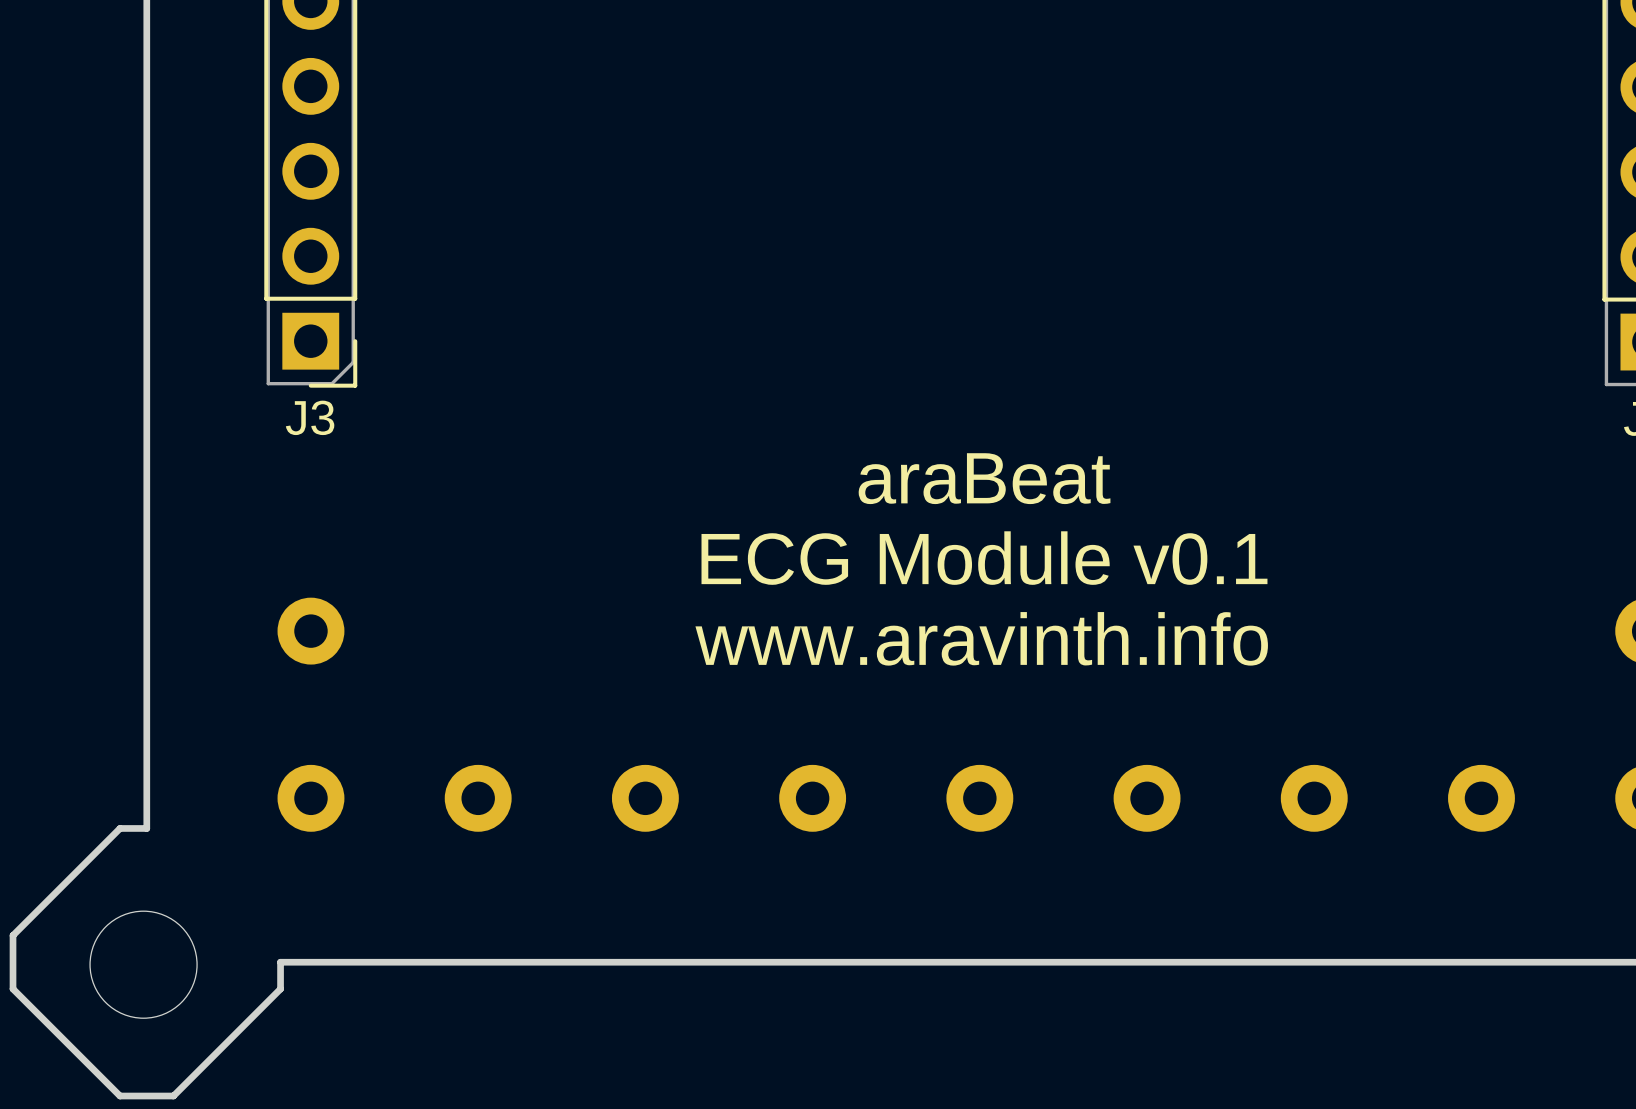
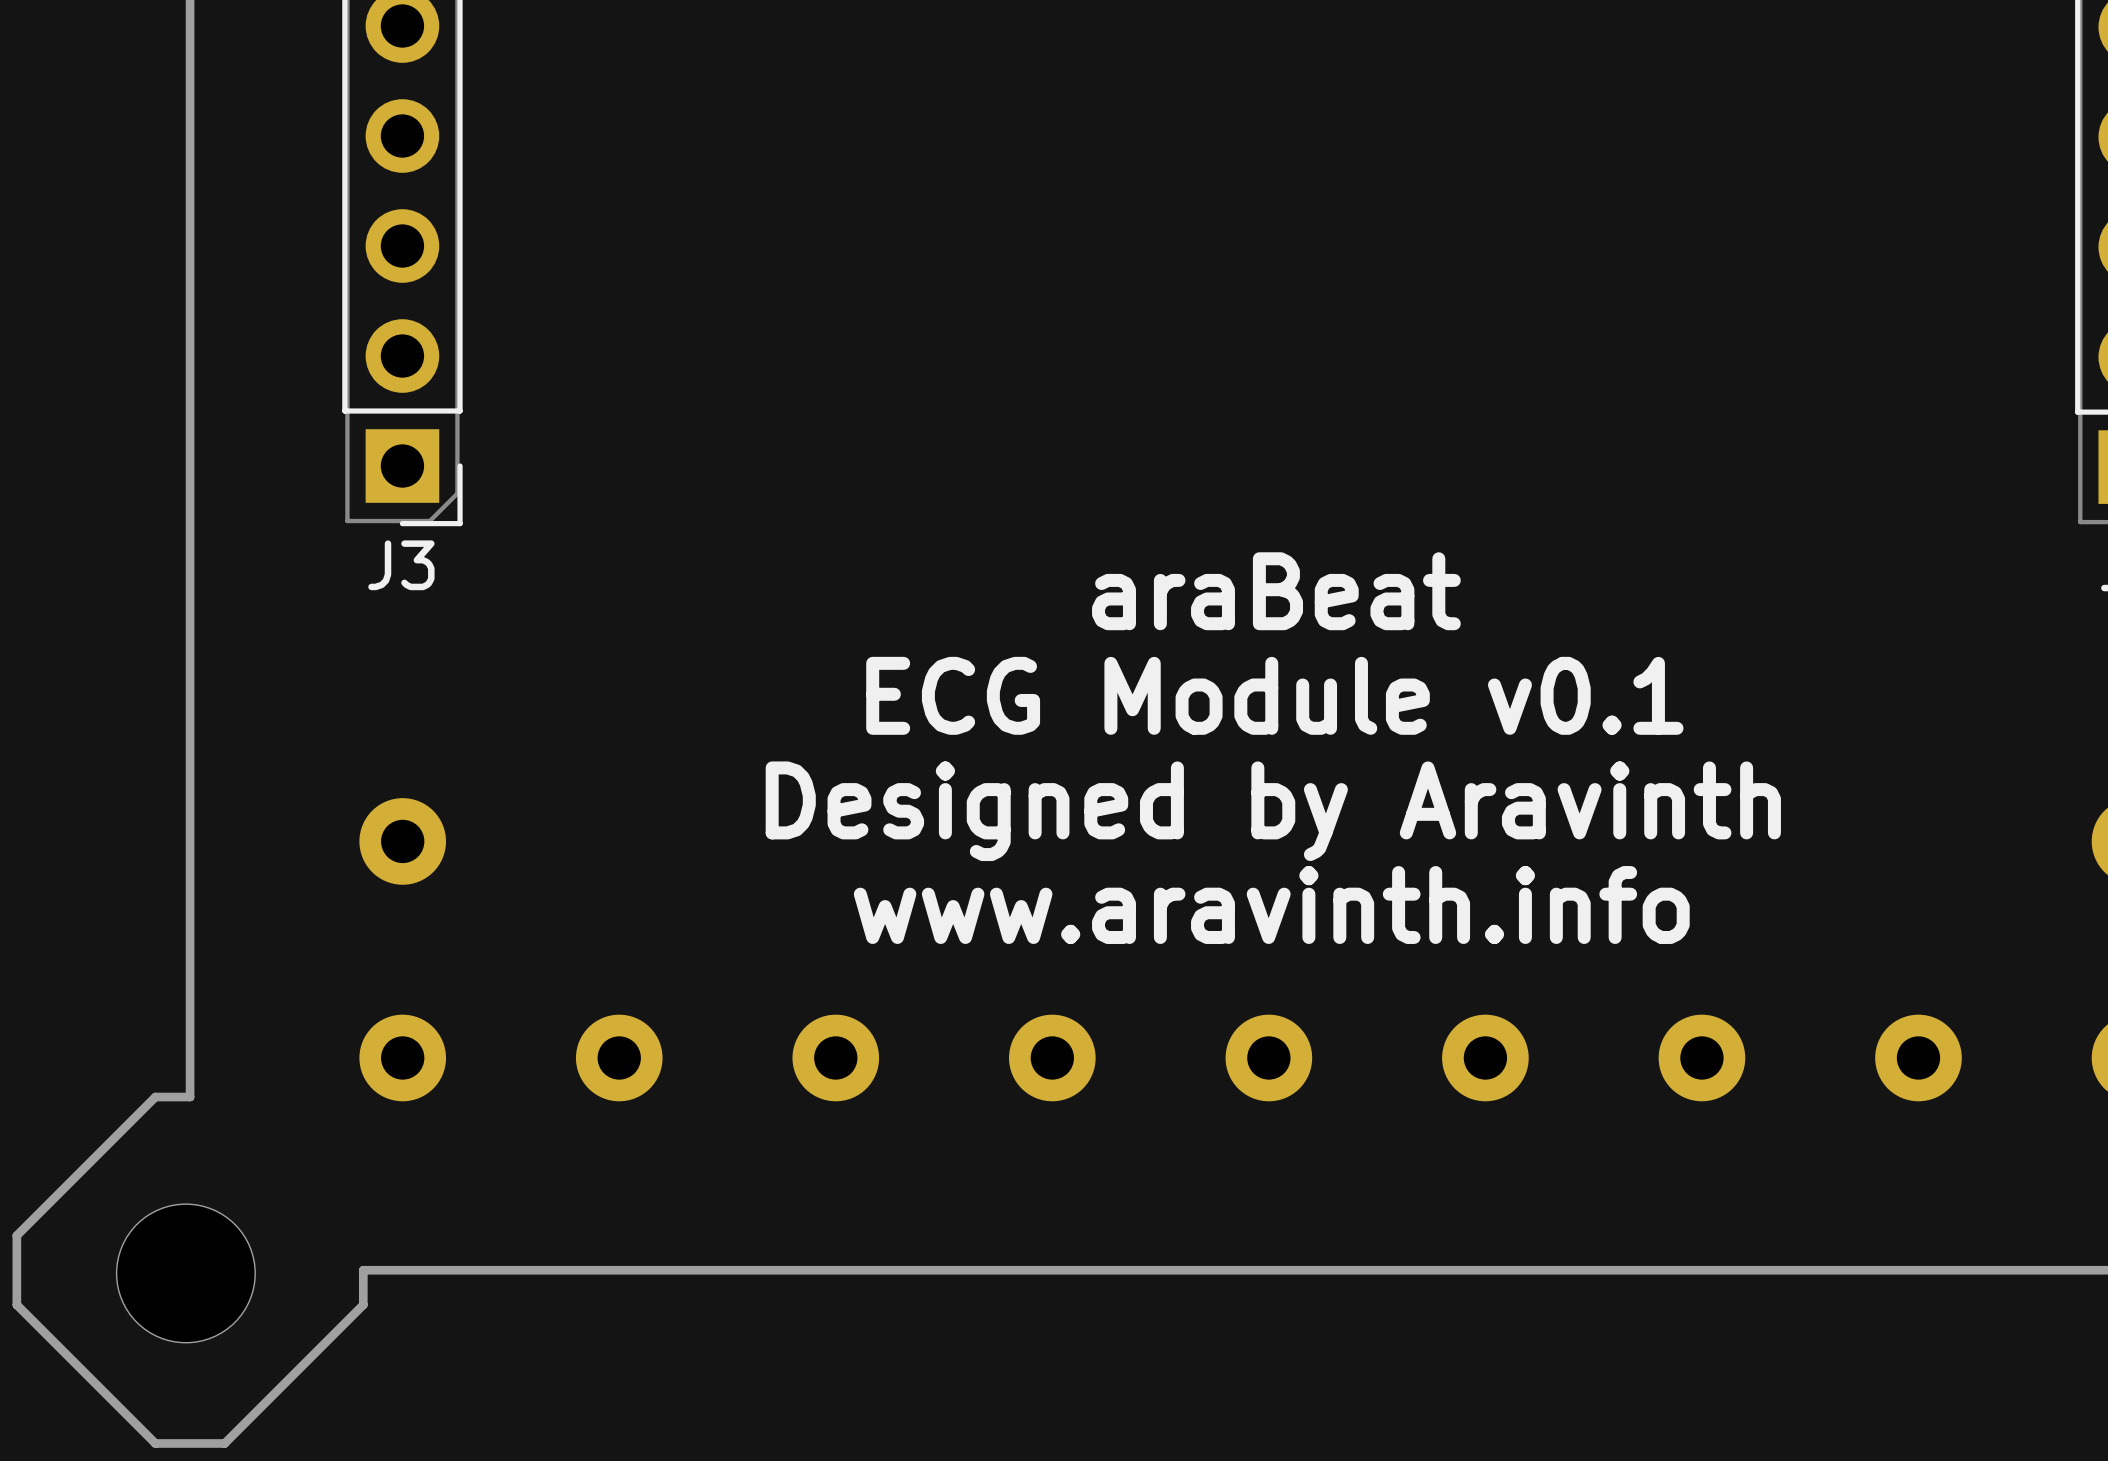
text position: araBeat (984, 478) -> araBeat (1276, 591)
text position: ECG Module v0.1 (984, 558) -> ECG Module v0.1 (1274, 695)
text: none -> Designed by Aravinth (1273, 811)
text position: www.aravinth.info (981, 638) -> www.aravinth.info (1271, 905)

